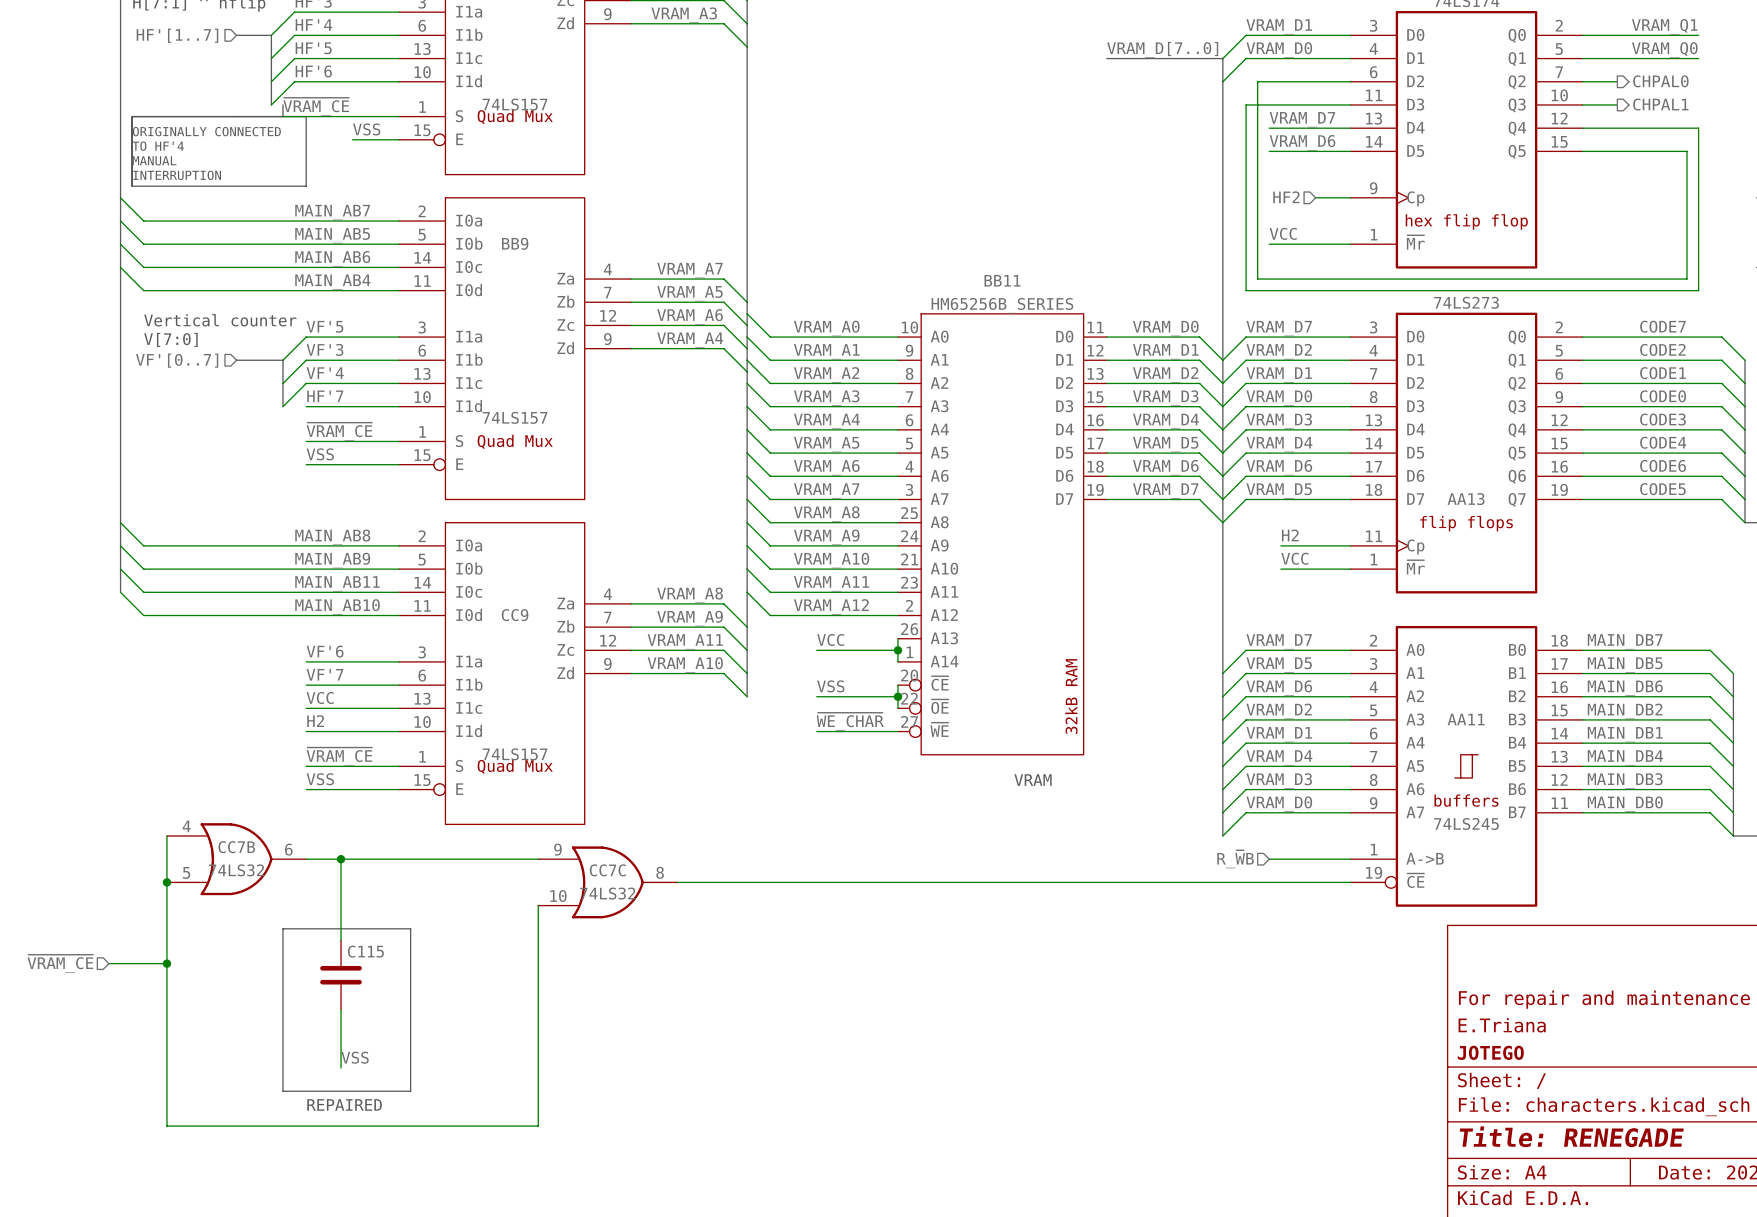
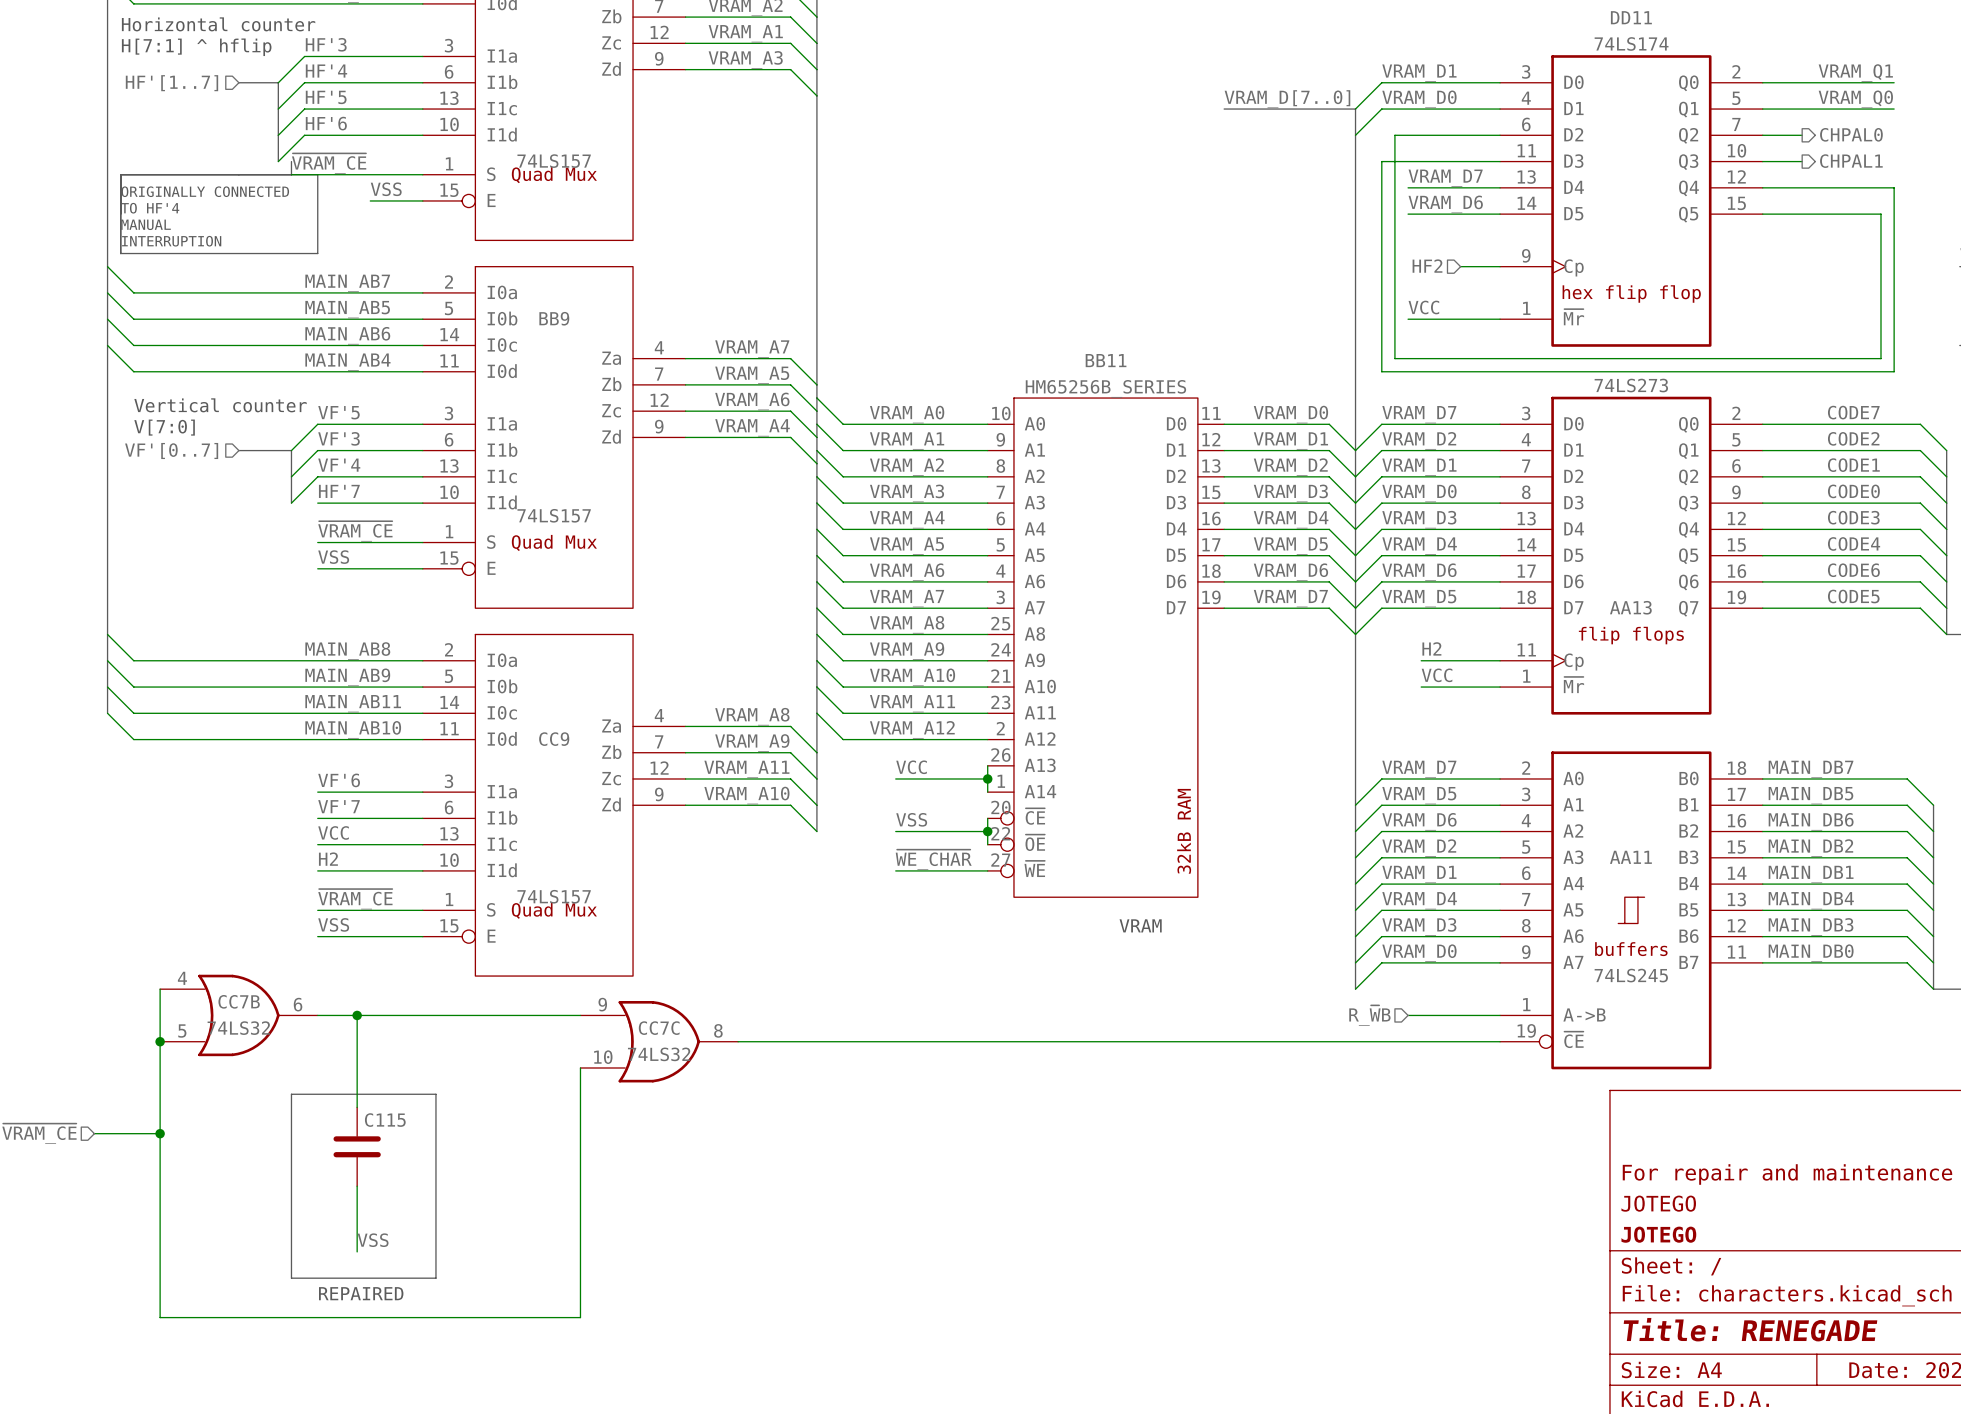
title block: E.Triana (1502, 1025) -> JOTEGO (1658, 1203)

